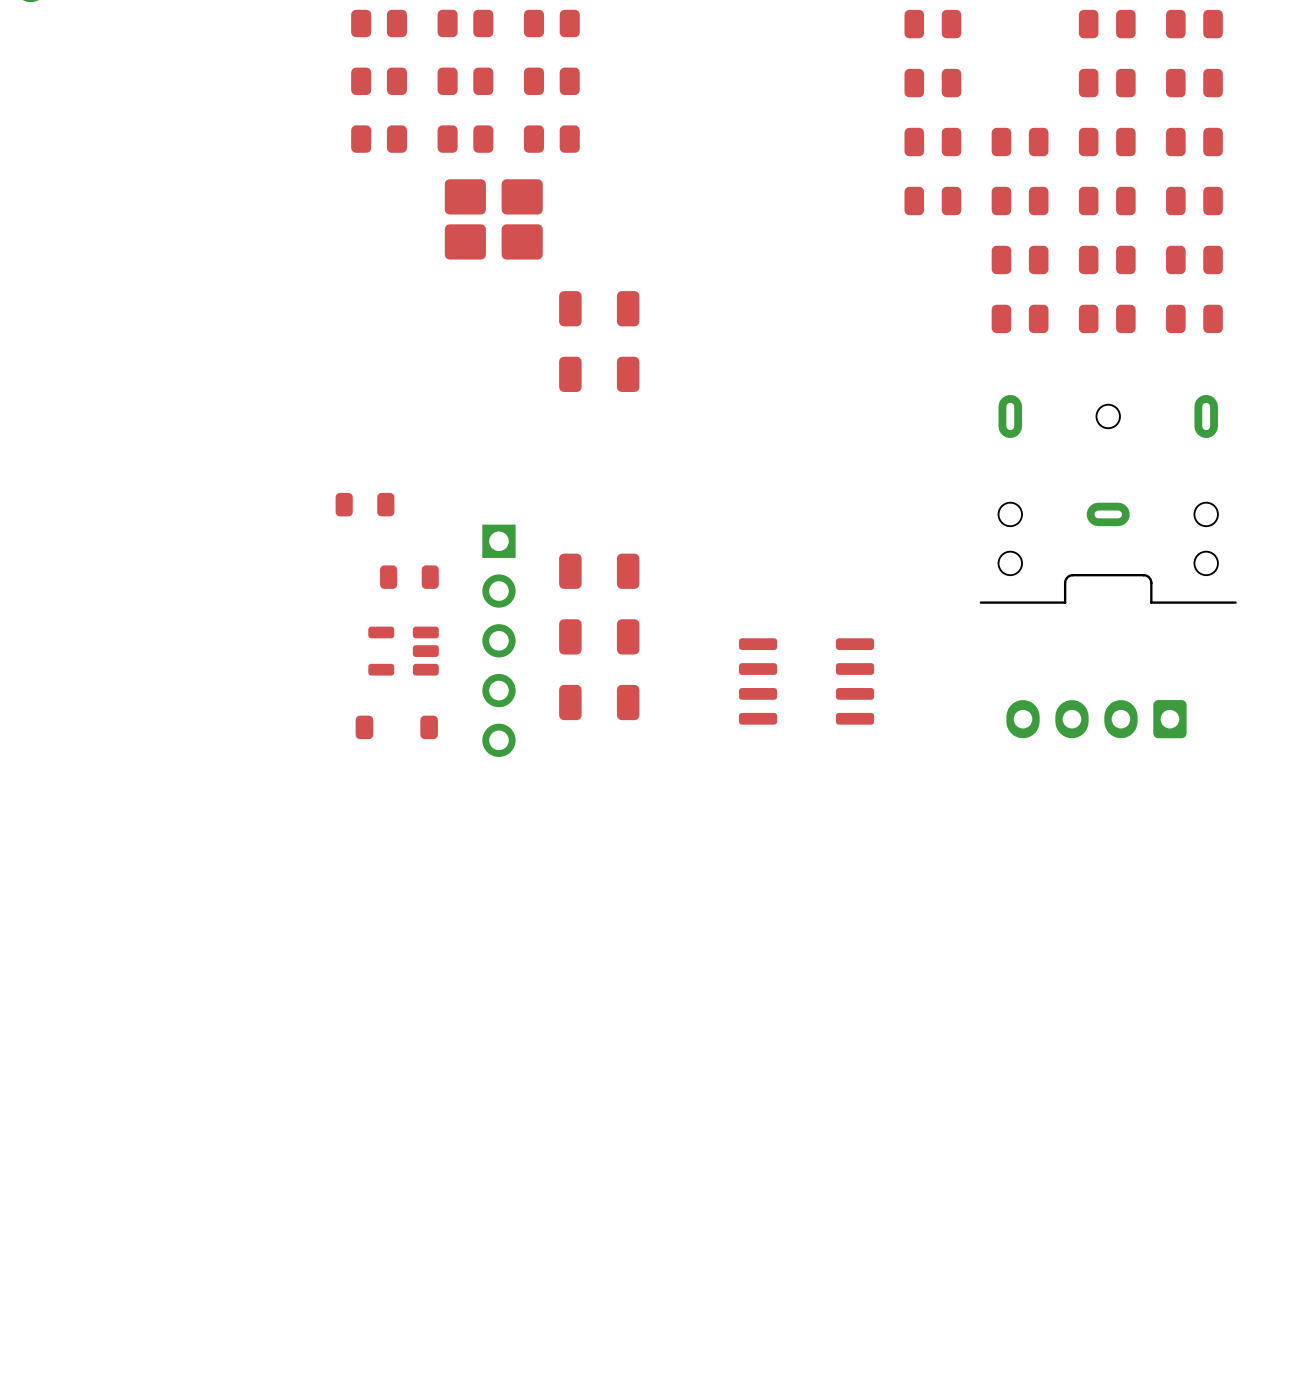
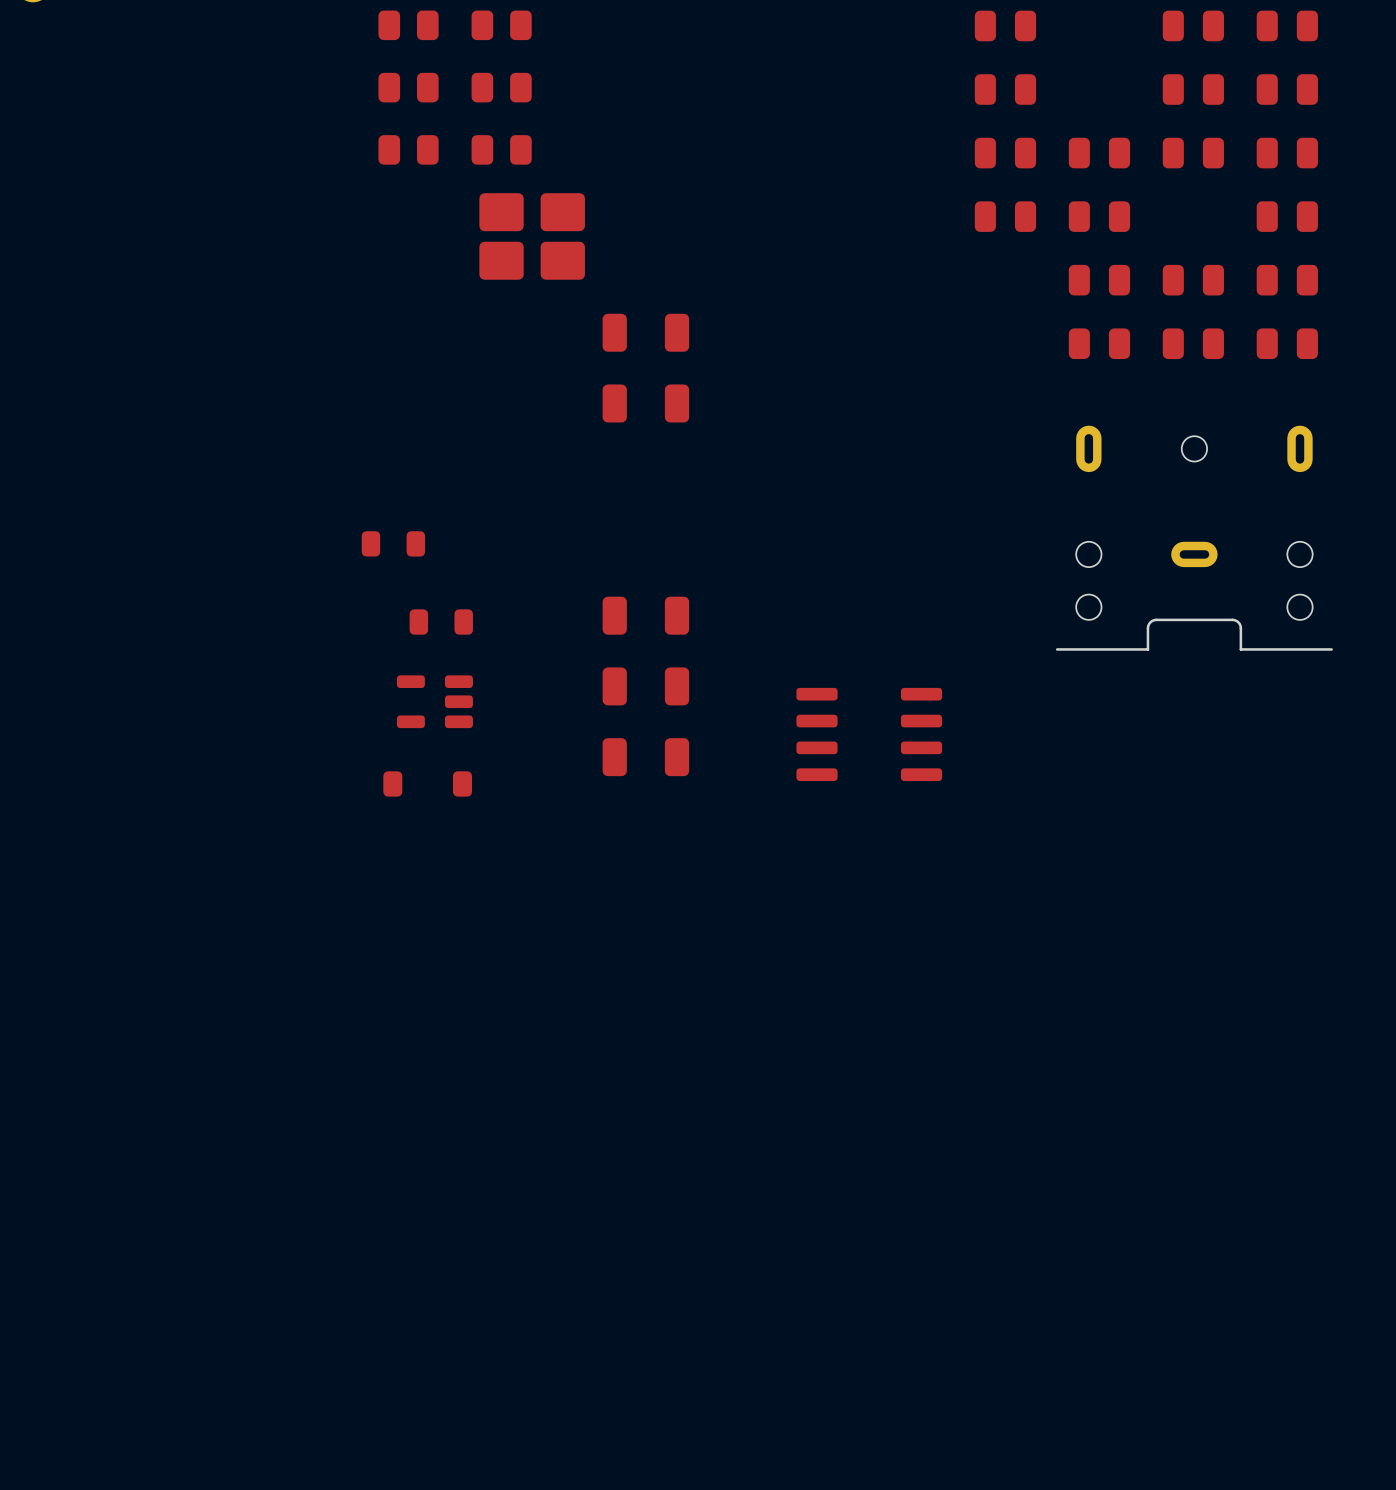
part: (551, 23) -> none
part: (551, 81) -> none
part: (551, 139) -> none
part: (1107, 200) -> none
part: (498, 640) -> none
part: (1096, 719) -> none

